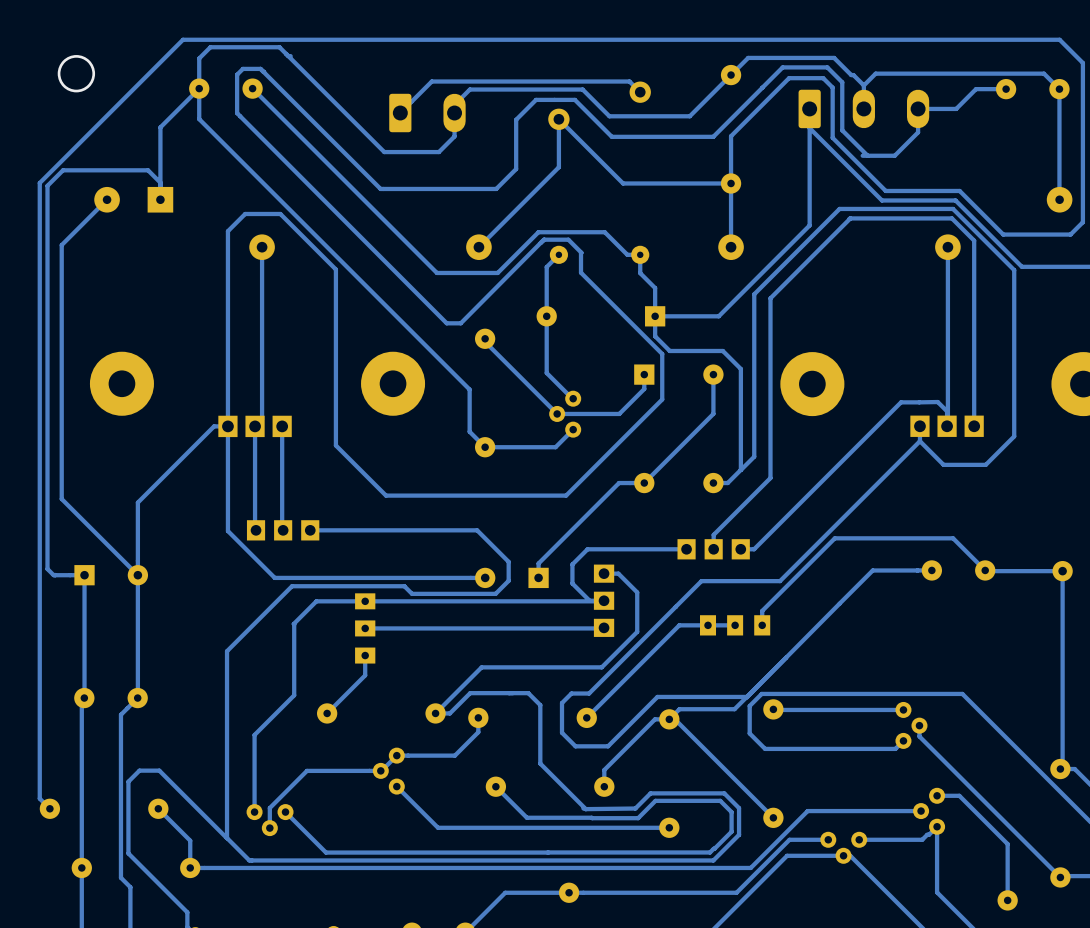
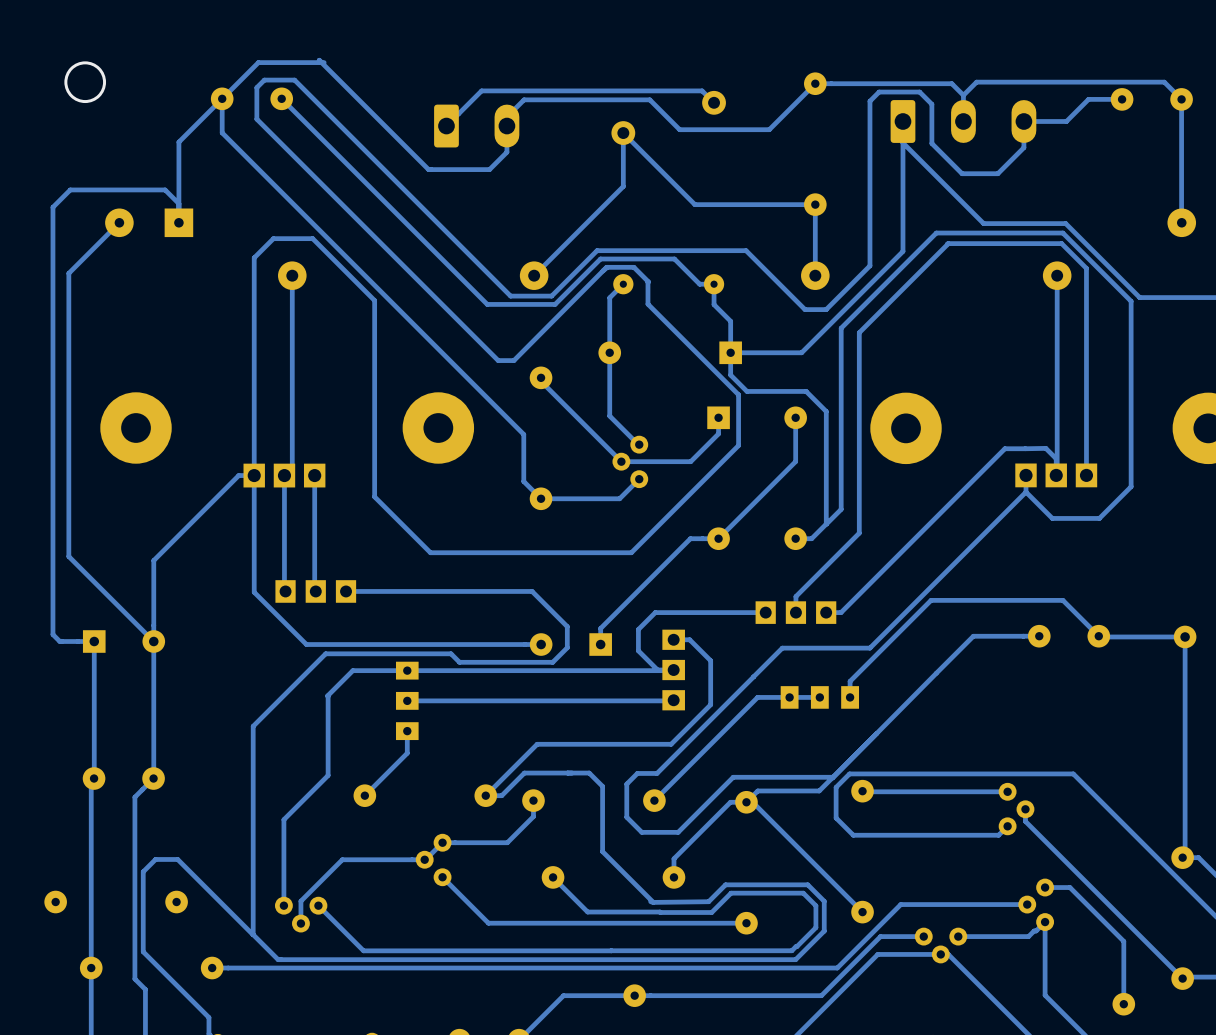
bottom track: (286, 54) (279, 47) (210, 47) (199, 58) (199, 88) -> (321, 62) (258, 62) (222, 98)
bottom track: none -> (294, 80) (510, 296) (551, 296) (597, 250) (746, 250) (805, 309) (826, 309) (869, 265) (869, 101) (879, 92) (919, 92) (931, 104) (931, 143) (962, 173)
bottom track: (851, 75) (834, 57) (748, 57) (731, 75) -> (949, 83) (815, 83)
bottom track: (867, 155) (842, 130) (842, 82) (827, 67) (782, 67) (713, 136) (611, 136) (574, 99) (536, 99) (516, 119) (516, 169) (496, 188) (380, 188) (260, 68) (242, 68) (237, 74) (237, 113) (446, 323) -> (293, 80) (264, 80) (256, 87) (256, 119) (498, 360)
bottom track: (731, 183) (731, 136) (789, 78) (823, 78) (832, 87) (832, 137) (885, 190) (959, 190) (1003, 234) (1070, 234) (1082, 222) (1082, 62) (1059, 39) (183, 39) (39, 183) (39, 798) (49, 808) -> none
bottom track: (158, 808) (190, 840) (190, 867) -> none

